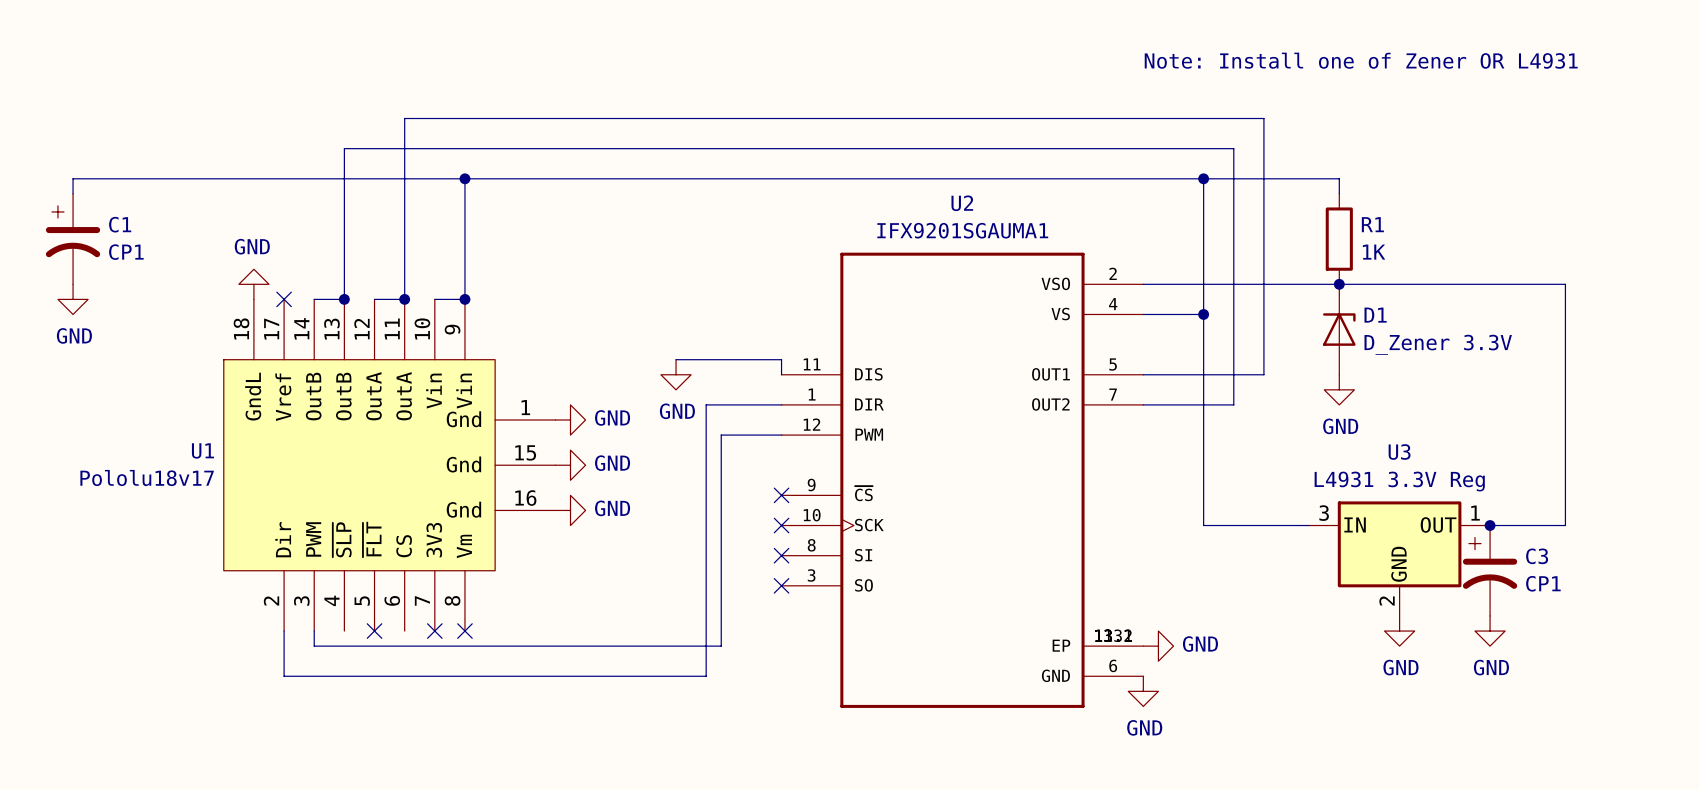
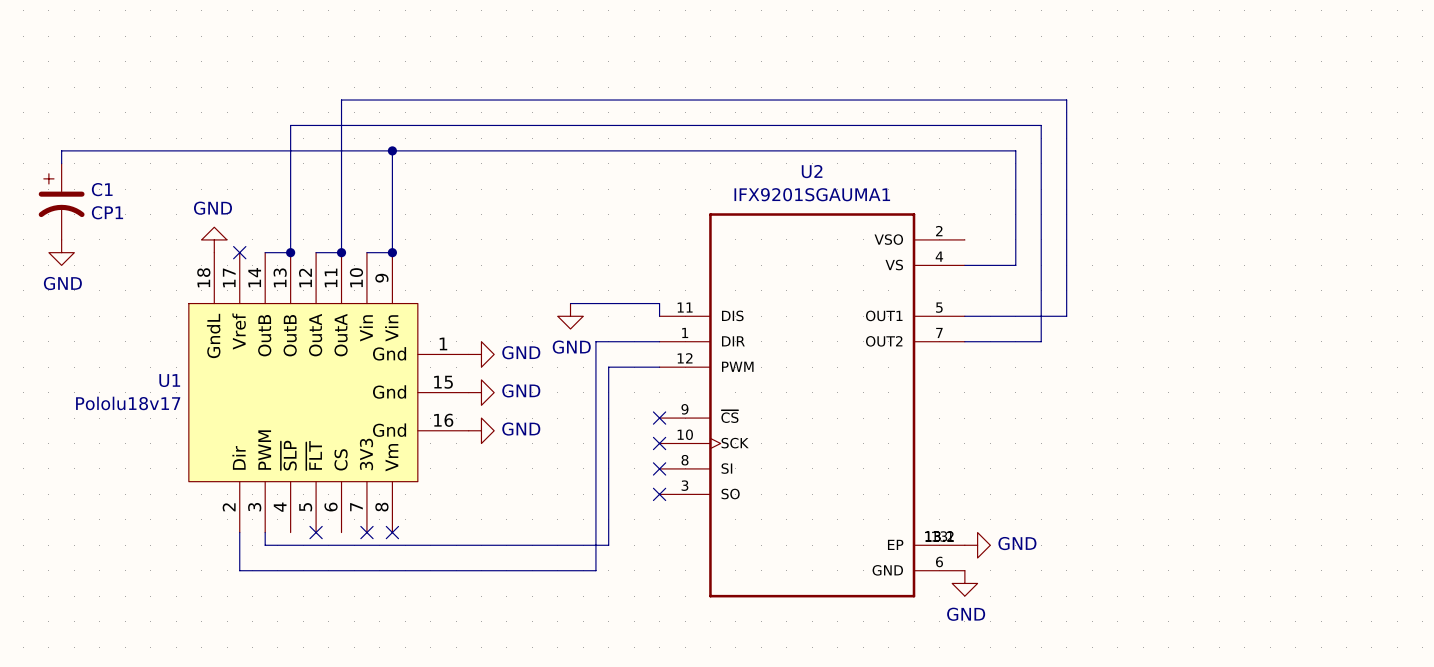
text: Note: Install one of Zener OR L4931 (1361, 60) -> none
wire: (1203, 178) (1339, 178) (1339, 193) -> none
junction: (1203, 178) -> none
R1: 1K (1339, 239) -> none
wire: (1143, 284) (1565, 284) (1565, 525) (1490, 525) -> none
junction: (1339, 284) -> none
wire: (1203, 314) (1203, 525) (1309, 525) -> none
junction: (1203, 314) -> none
D1: D_Zener 3.3V (1339, 329) -> none
power symbol: GND (1339, 389) -> none
junction: (1490, 525) -> none
U3: L4931 3.3V Reg (1399, 558) -> none
C3: CP1 (1490, 570) -> none
power symbol: GND (1399, 631) -> none
power symbol: GND (1490, 631) -> none

